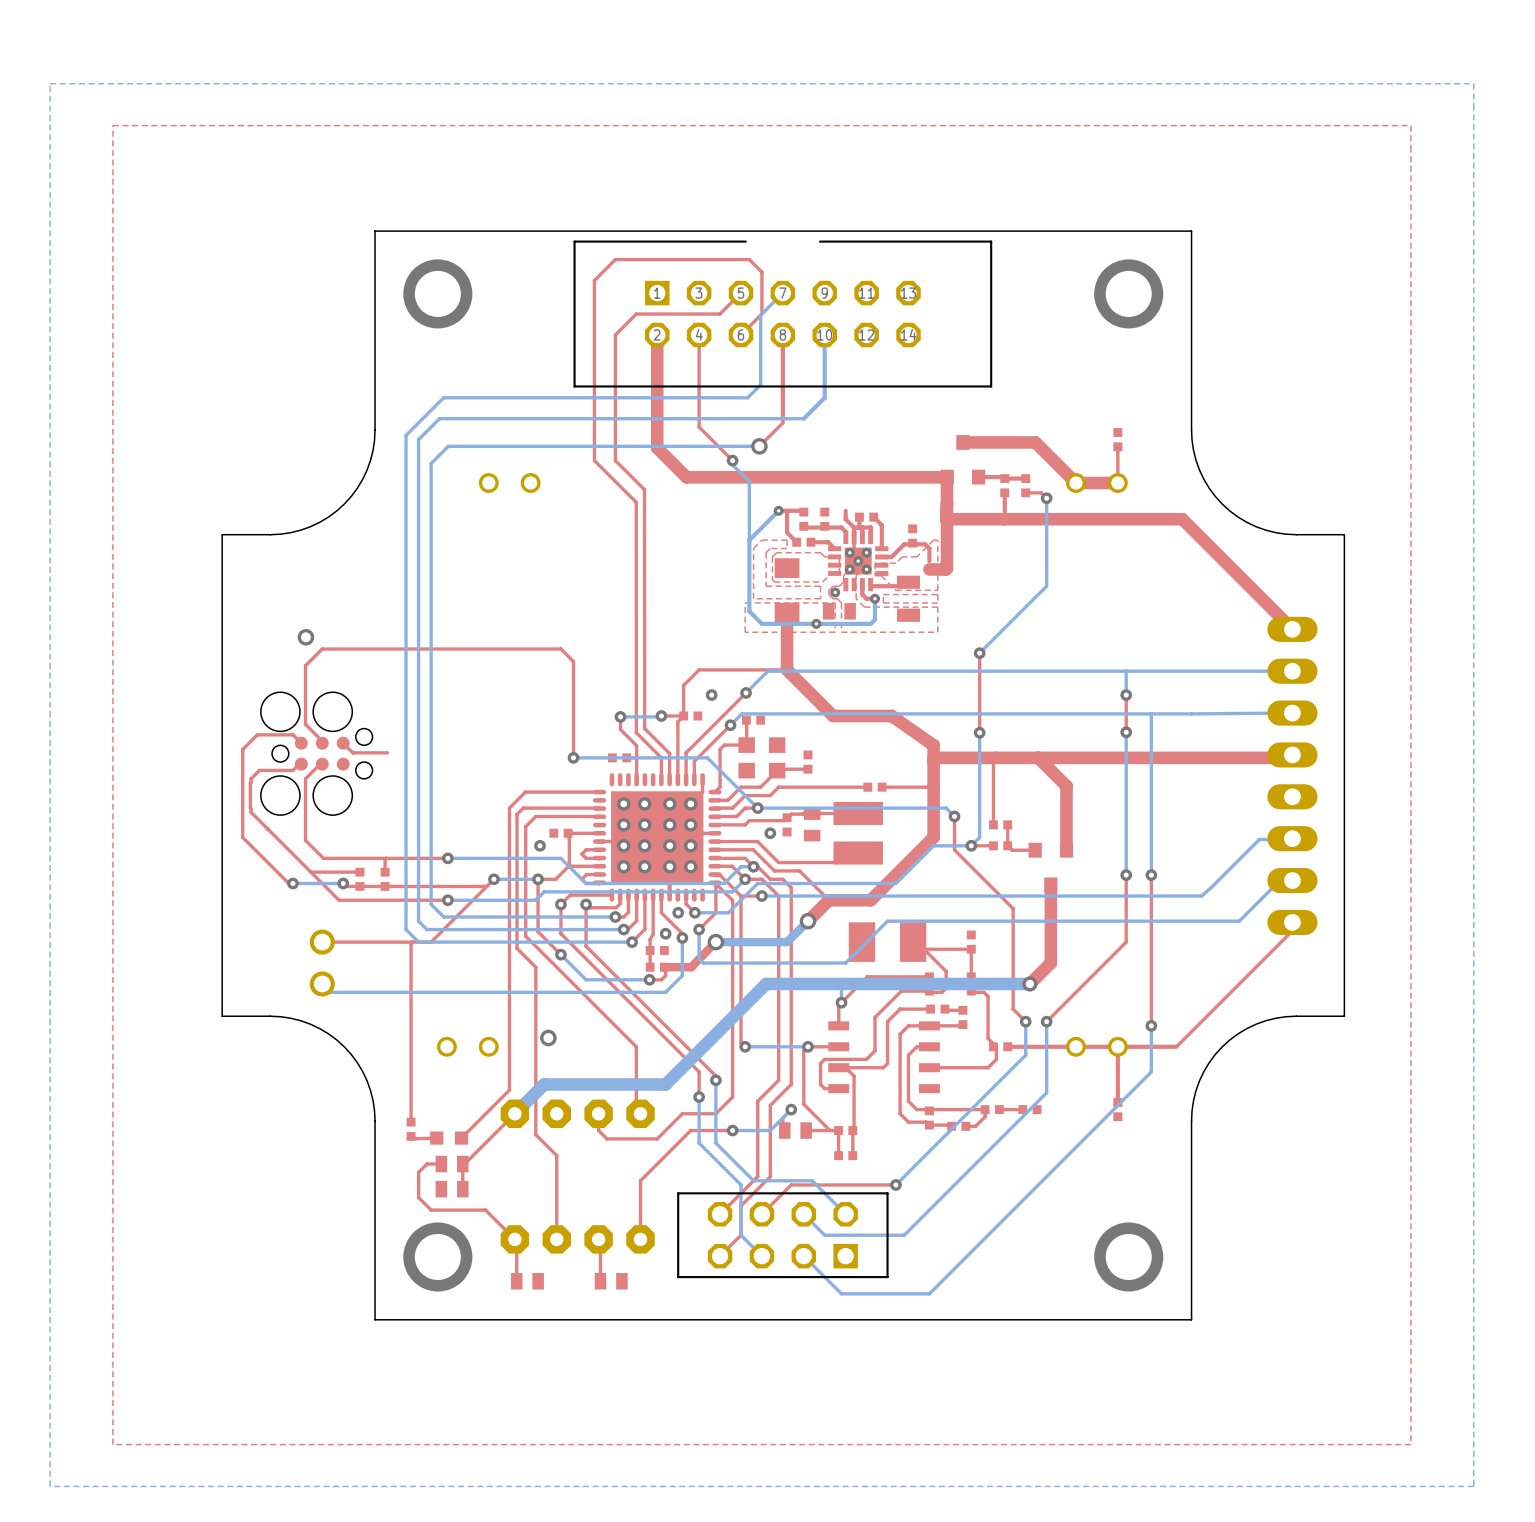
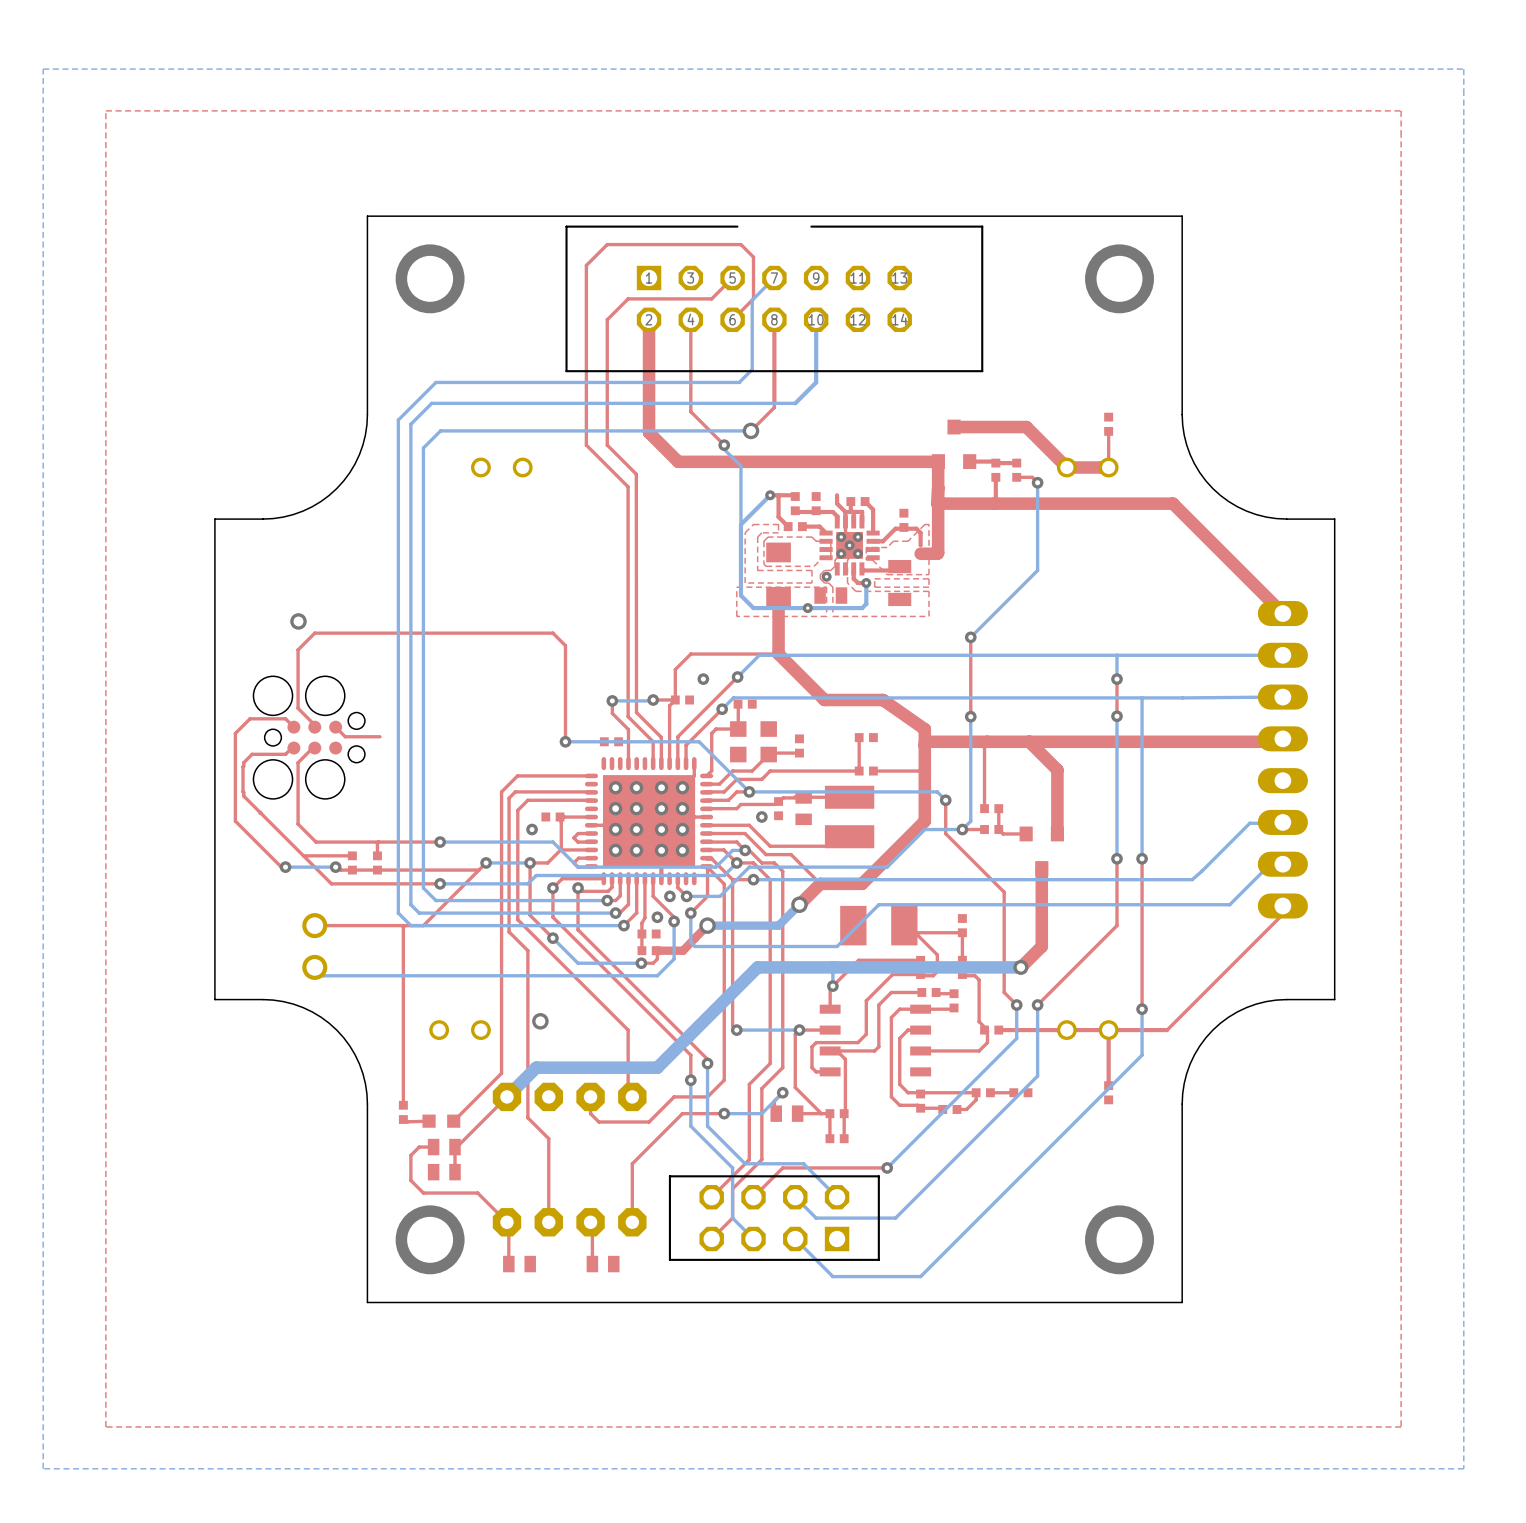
top track: none -> (859, 737) (859, 771)
part: none -> (866, 737)

